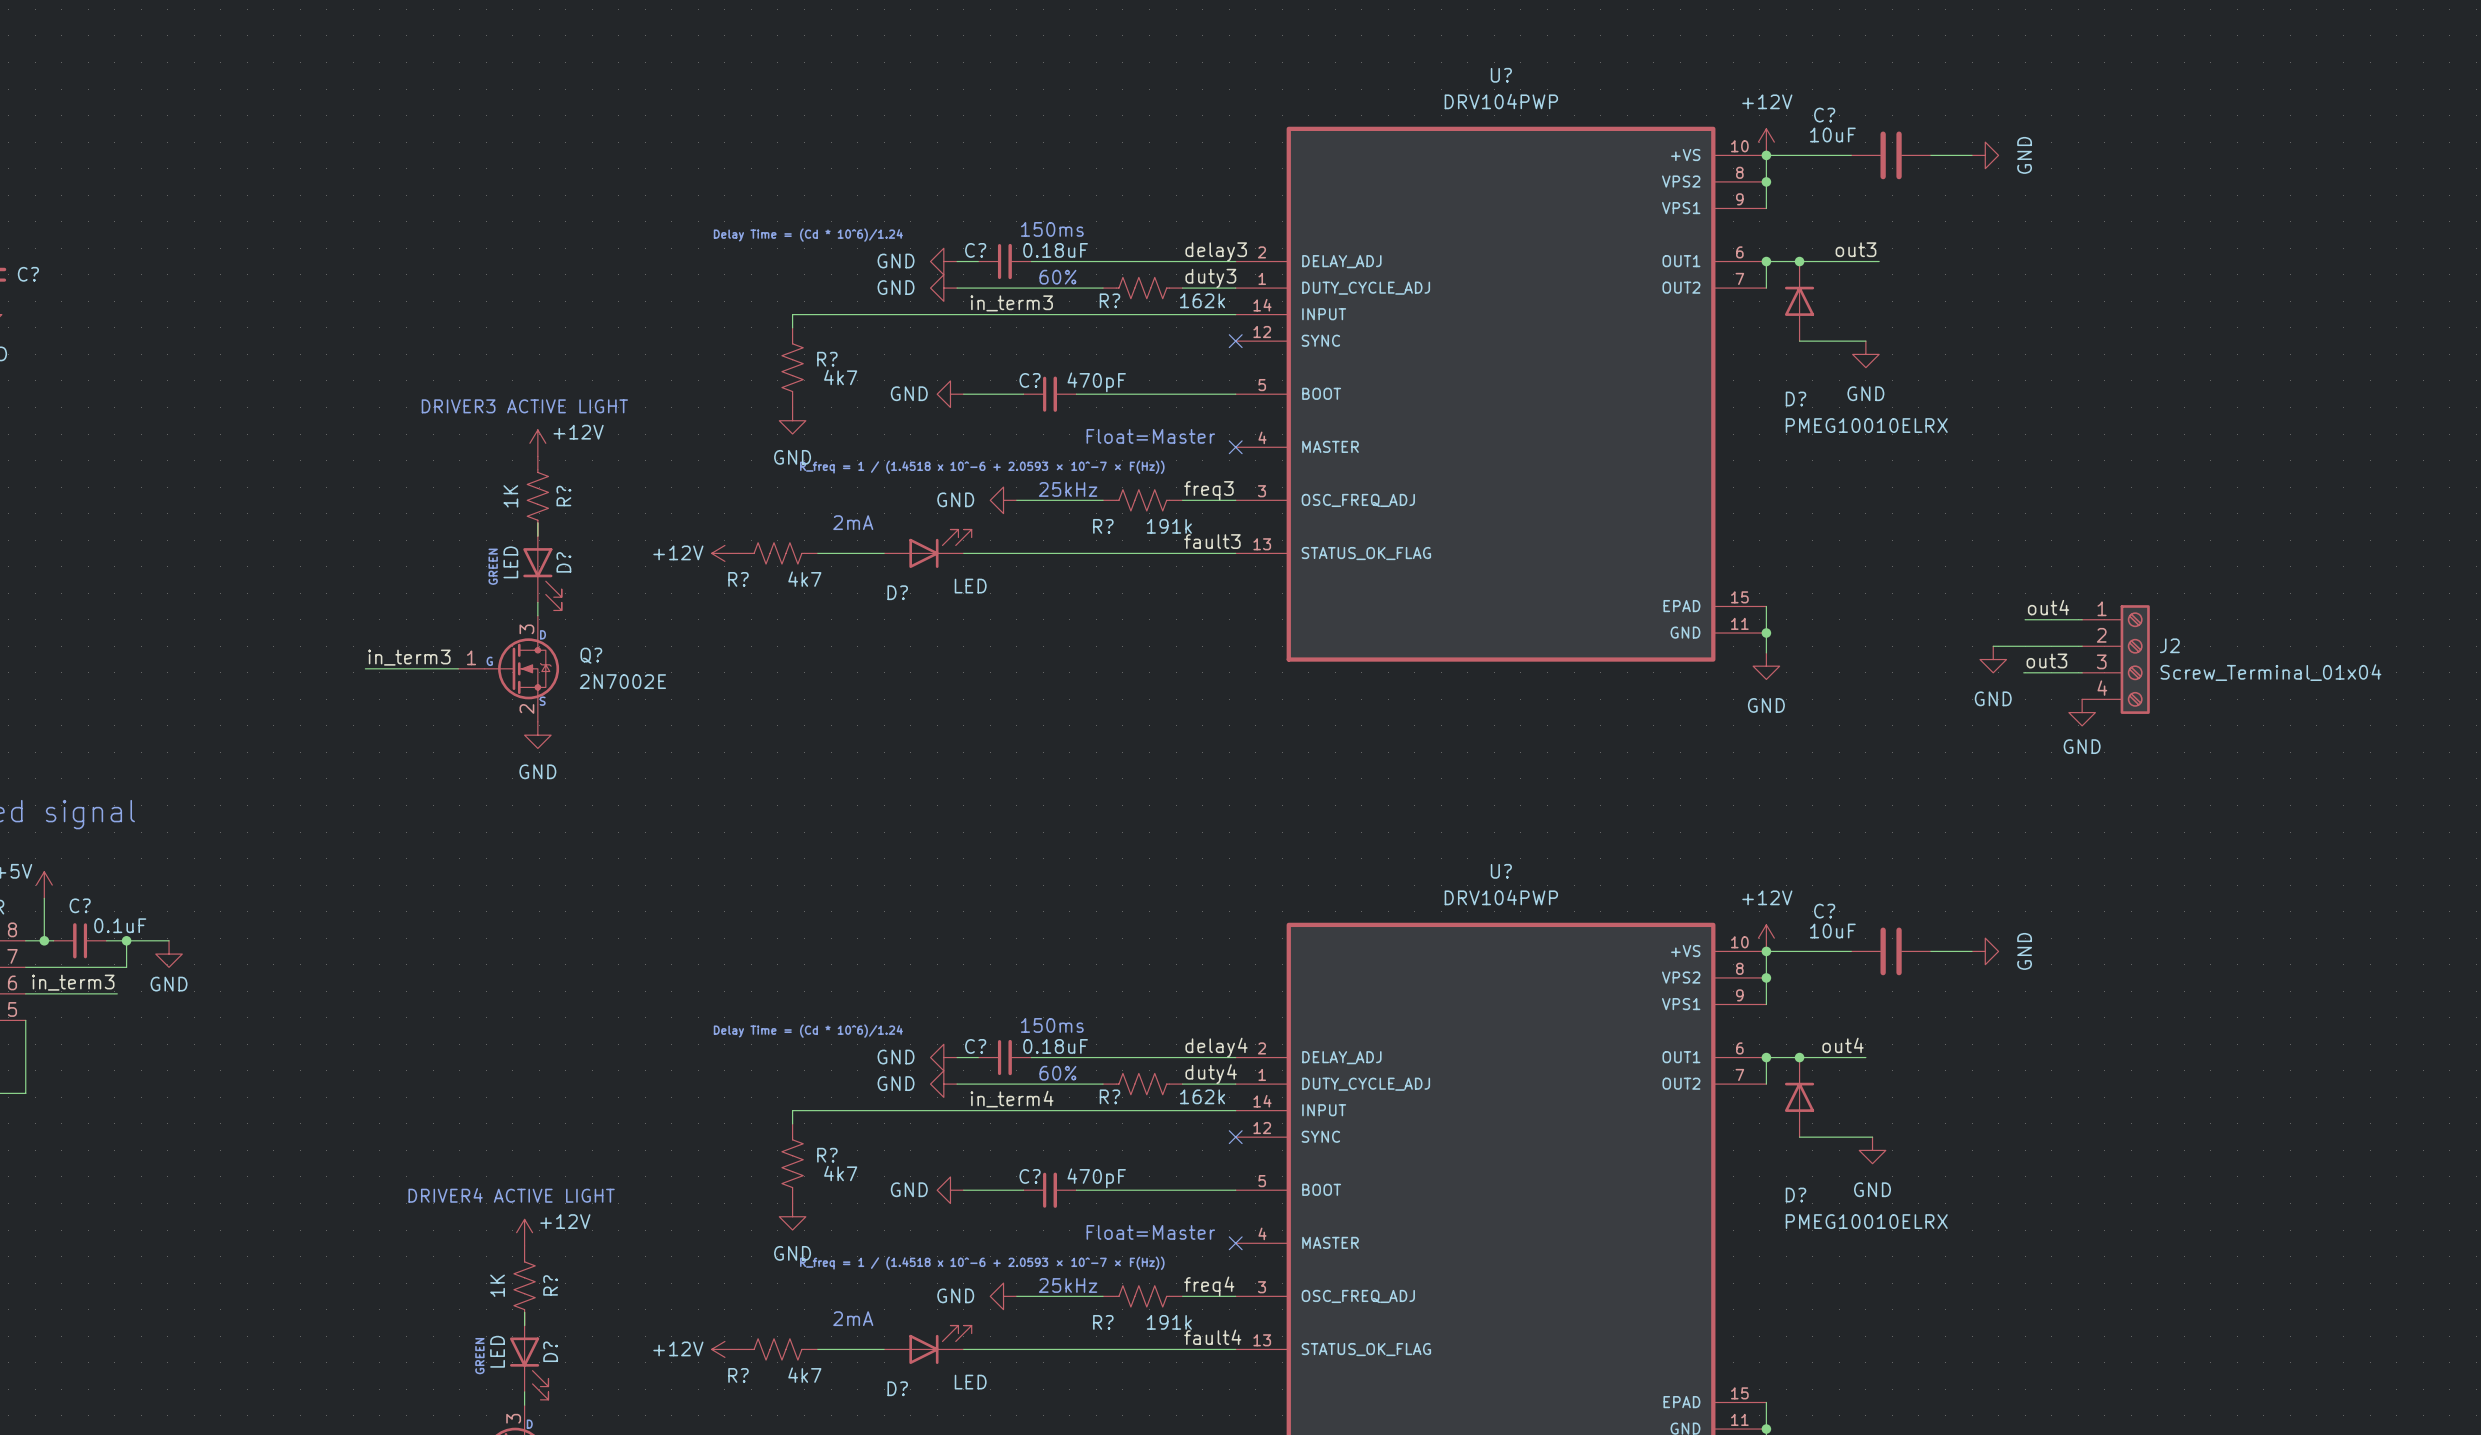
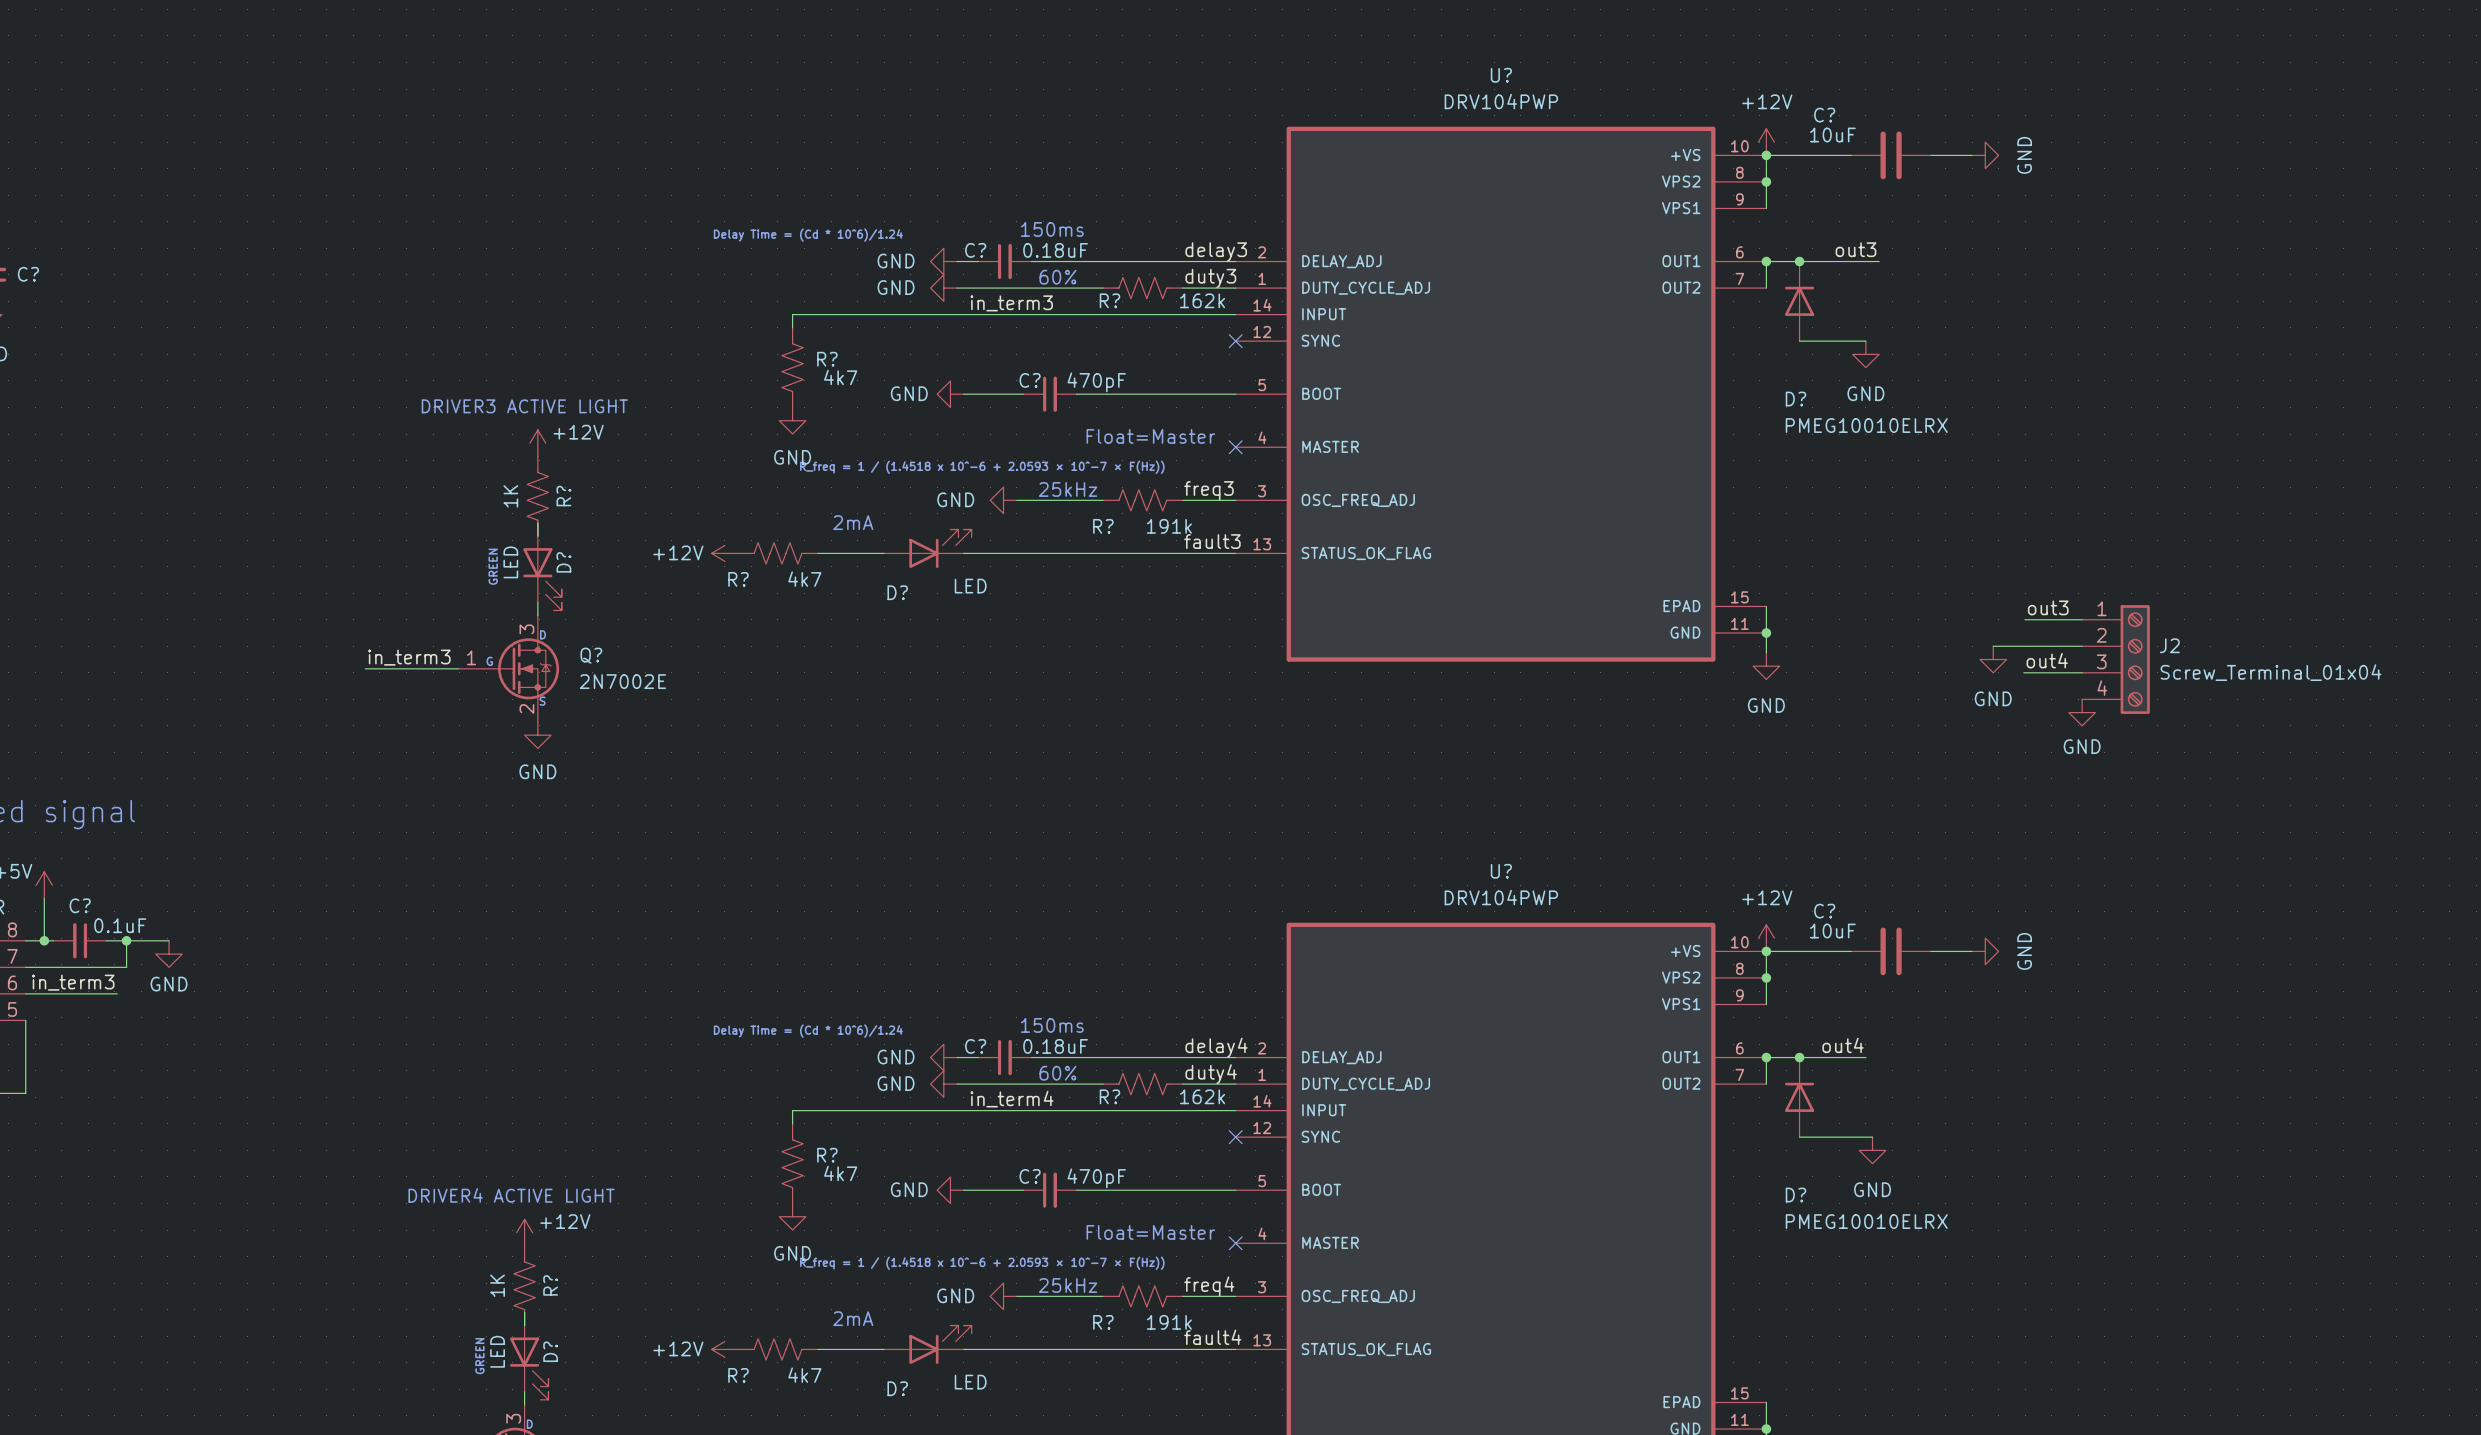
label: out4 (2048, 607) -> out3 (2048, 607)
label: out3 (2046, 660) -> out4 (2047, 660)

